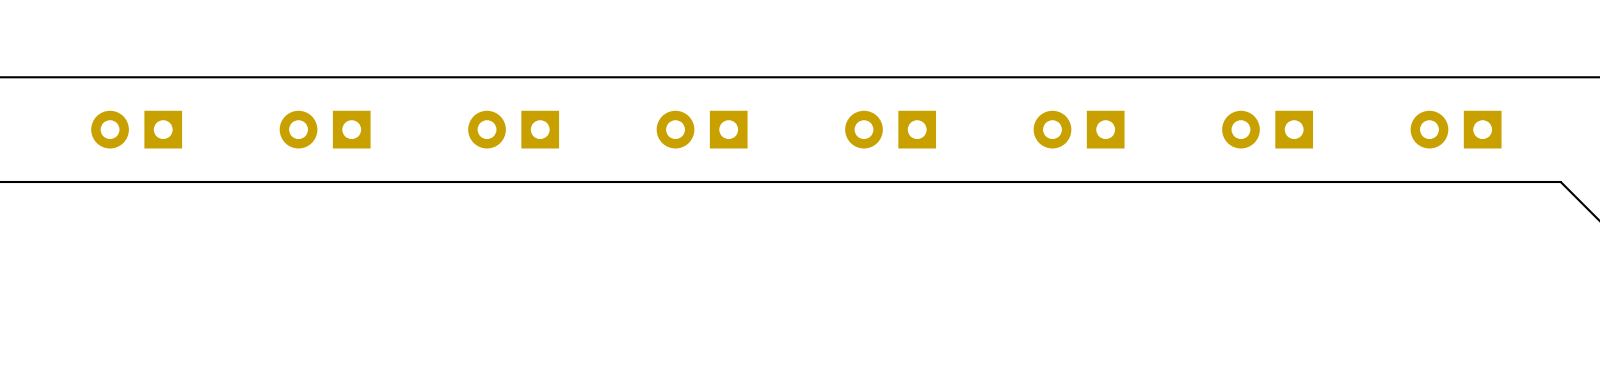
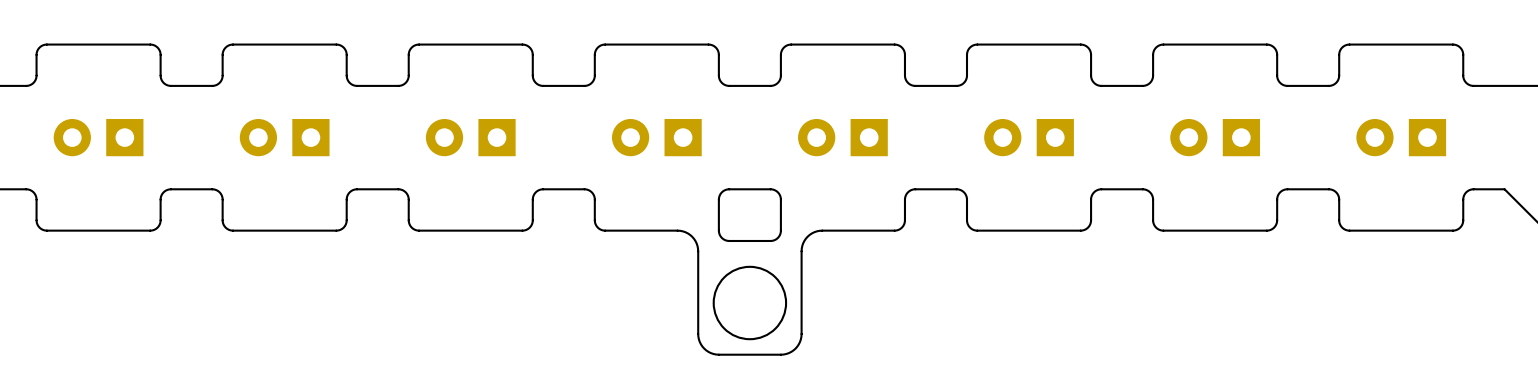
board edge: (209, 77) (63, 77) -> (170, 85) (162, 80) (160, 52) (156, 46) (150, 44) (44, 44) (36, 52) (35, 79) (32, 83) (26, 85)
board edge: (398, 77) (251, 77) -> (357, 85) (348, 80) (346, 52) (342, 46) (336, 44) (230, 44) (222, 52) (221, 79) (218, 83) (212, 85)
board edge: (586, 77) (440, 77) -> (543, 85) (534, 80) (532, 52) (528, 46) (522, 44) (416, 44) (409, 52) (407, 79) (404, 83) (398, 85)
board edge: (775, 77) (628, 77) -> (729, 85) (720, 80) (718, 52) (714, 46) (708, 44) (602, 44) (595, 52) (594, 79) (590, 83) (584, 85)
board edge: (963, 77) (817, 77) -> (915, 85) (906, 80) (904, 52) (900, 46) (894, 44) (788, 44) (781, 52) (780, 79) (776, 83) (770, 85)
board edge: (1152, 77) (1005, 77) -> (1101, 85) (1092, 80) (1090, 52) (1087, 46) (1080, 44) (974, 44) (967, 52) (966, 79) (962, 83) (956, 85)
board edge: (1340, 77) (1194, 77) -> (1287, 85) (1278, 80) (1276, 52) (1273, 46) (1266, 44) (1160, 44) (1153, 52) (1152, 79) (1149, 83) (1142, 85)
board edge: (1529, 77) (1382, 77) -> (1473, 85) (1464, 80) (1462, 52) (1459, 46) (1452, 44) (1346, 44) (1339, 52) (1338, 79) (1335, 83) (1328, 85)
board edge: (209, 181) (63, 181) -> (170, 189) (162, 194) (160, 222) (156, 228) (150, 230) (44, 230) (36, 222) (35, 195) (32, 191) (26, 189)
board edge: (398, 181) (251, 181) -> (357, 189) (348, 194) (346, 222) (342, 228) (336, 230) (230, 230) (222, 222) (221, 195) (218, 191) (212, 189)
board edge: (586, 181) (440, 181) -> (543, 189) (534, 194) (532, 222) (528, 228) (522, 230) (416, 230) (409, 222) (407, 195) (404, 191) (398, 189)
board edge: (775, 181) (628, 181) -> (729, 189) (721, 192) (718, 199) (719, 233) (722, 238) (729, 240) (771, 240) (778, 236) (780, 230) (780, 198) (776, 191) (770, 189)
board edge: (963, 181) (817, 181) -> (915, 189) (909, 191) (905, 195) (904, 222) (898, 229) (819, 230) (811, 233) (805, 238) (801, 251) (800, 339) (793, 350) (780, 354) (718, 354) (706, 350) (700, 344) (698, 336) (698, 251) (693, 238) (687, 233) (680, 230) (601, 229) (595, 222) (594, 195) (590, 191) (584, 189)
board edge: (1152, 181) (1005, 181) -> (1101, 189) (1092, 194) (1090, 222) (1087, 228) (1080, 230) (974, 230) (967, 222) (966, 195) (962, 191) (956, 189)
board edge: (1340, 181) (1194, 181) -> (1287, 189) (1278, 194) (1276, 222) (1273, 228) (1266, 230) (1160, 230) (1153, 222) (1152, 195) (1149, 191) (1142, 189)
board edge: (1529, 181) (1382, 181) -> (1473, 189) (1464, 194) (1462, 222) (1459, 228) (1452, 230) (1346, 230) (1339, 222) (1338, 195) (1335, 191) (1328, 189)
round board edge: none -> [712, 265, 788, 341]

